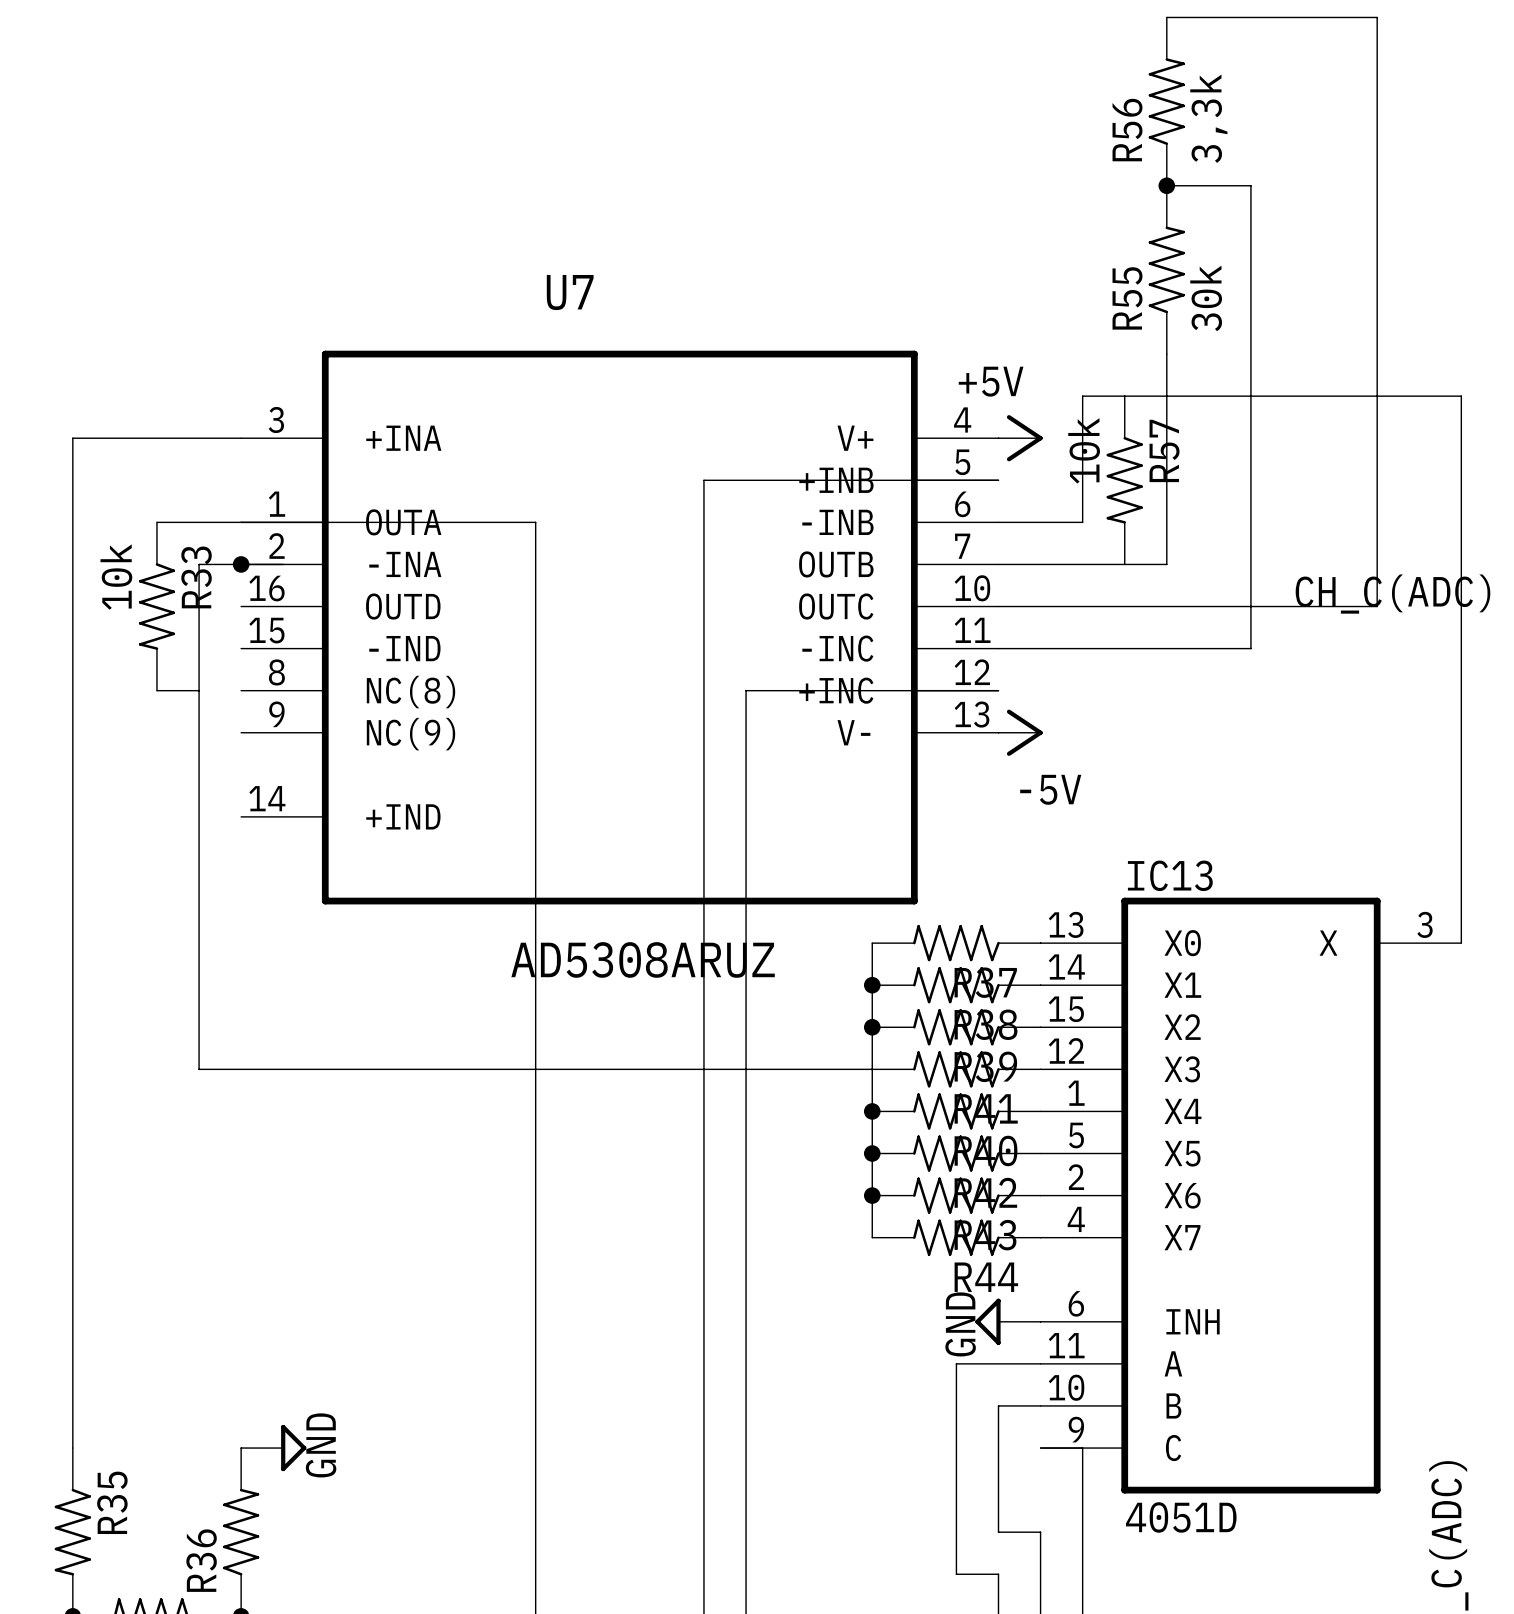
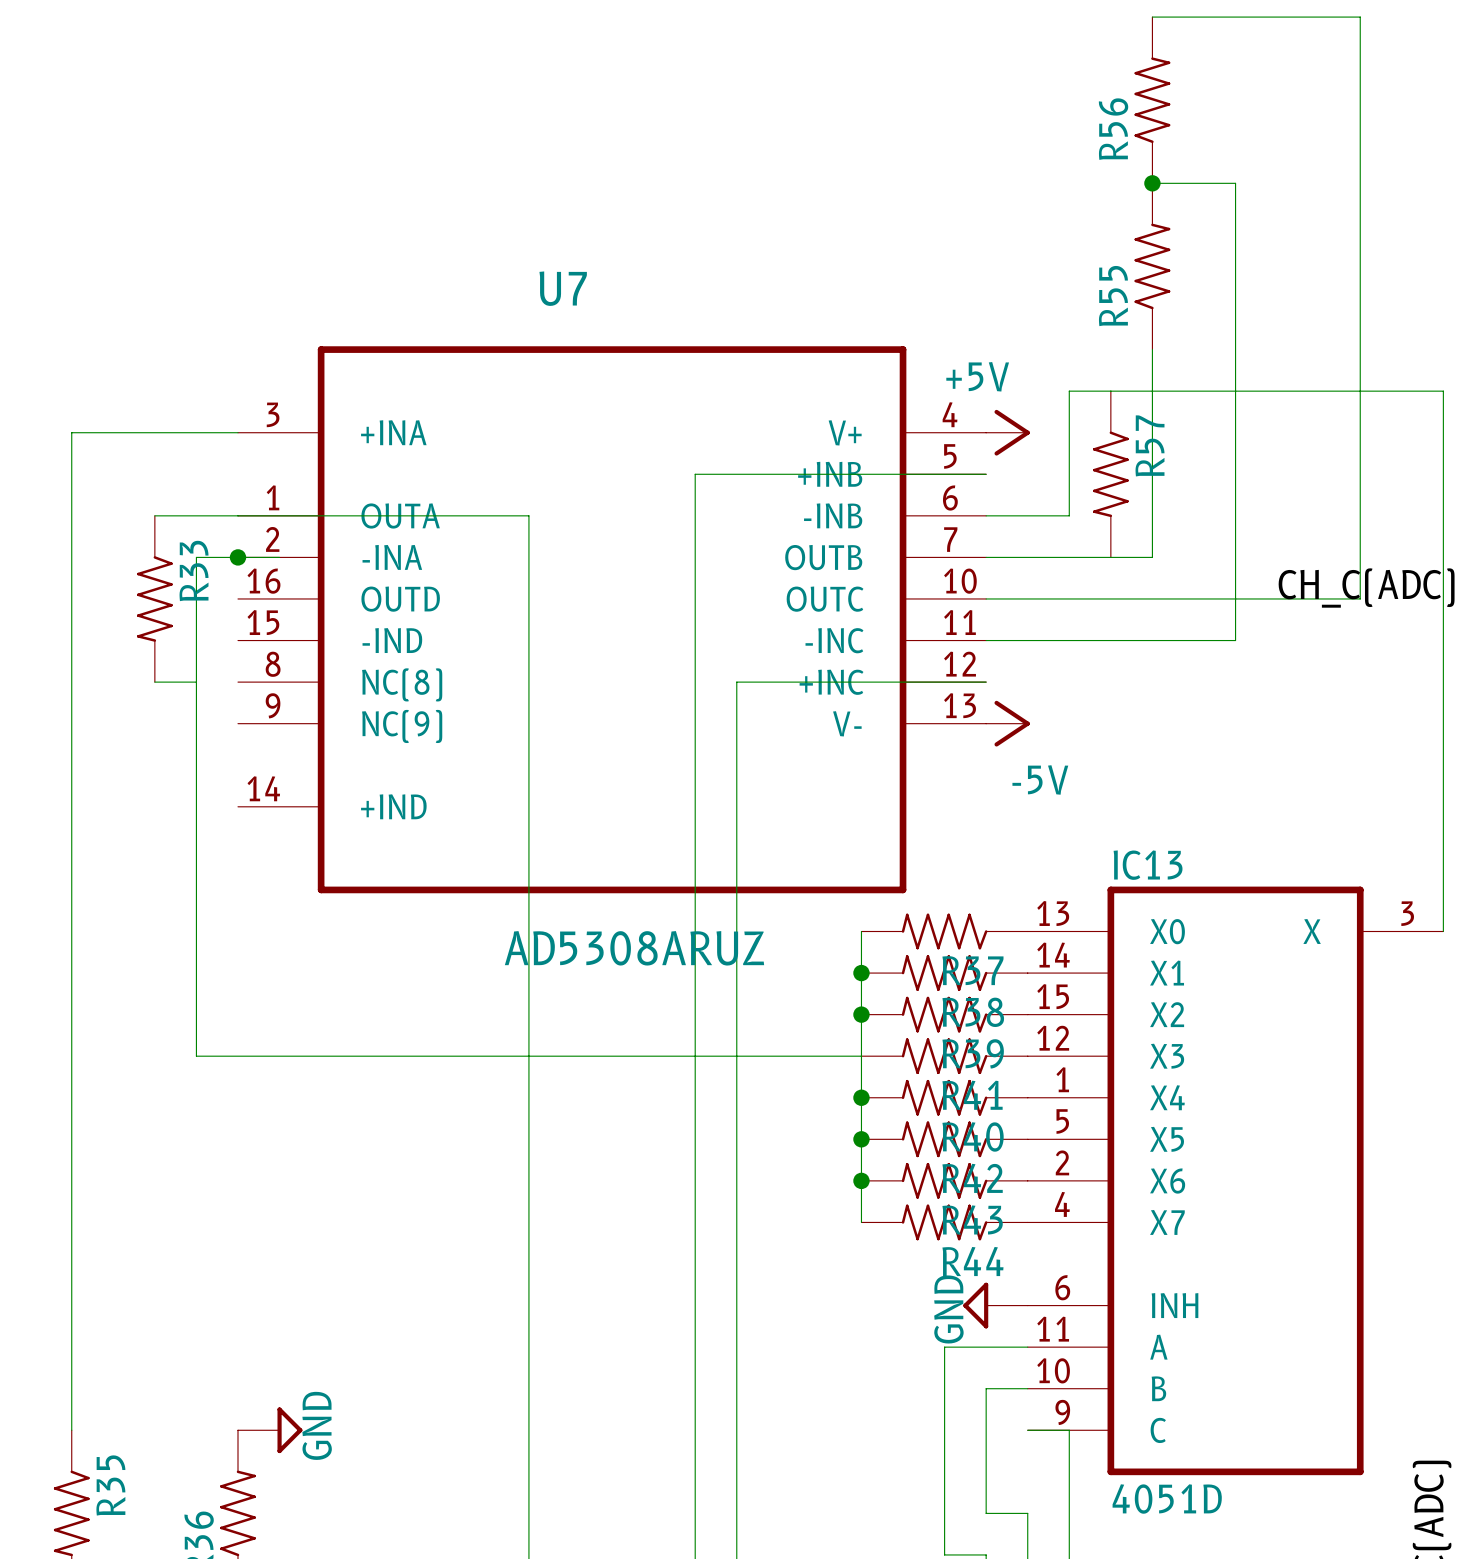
R56 value: 3,3k (1208, 118) -> none
R55 value: 30k (1206, 298) -> none
R57 value: 10k (1084, 450) -> none
R33 value: 10k (116, 577) -> none

